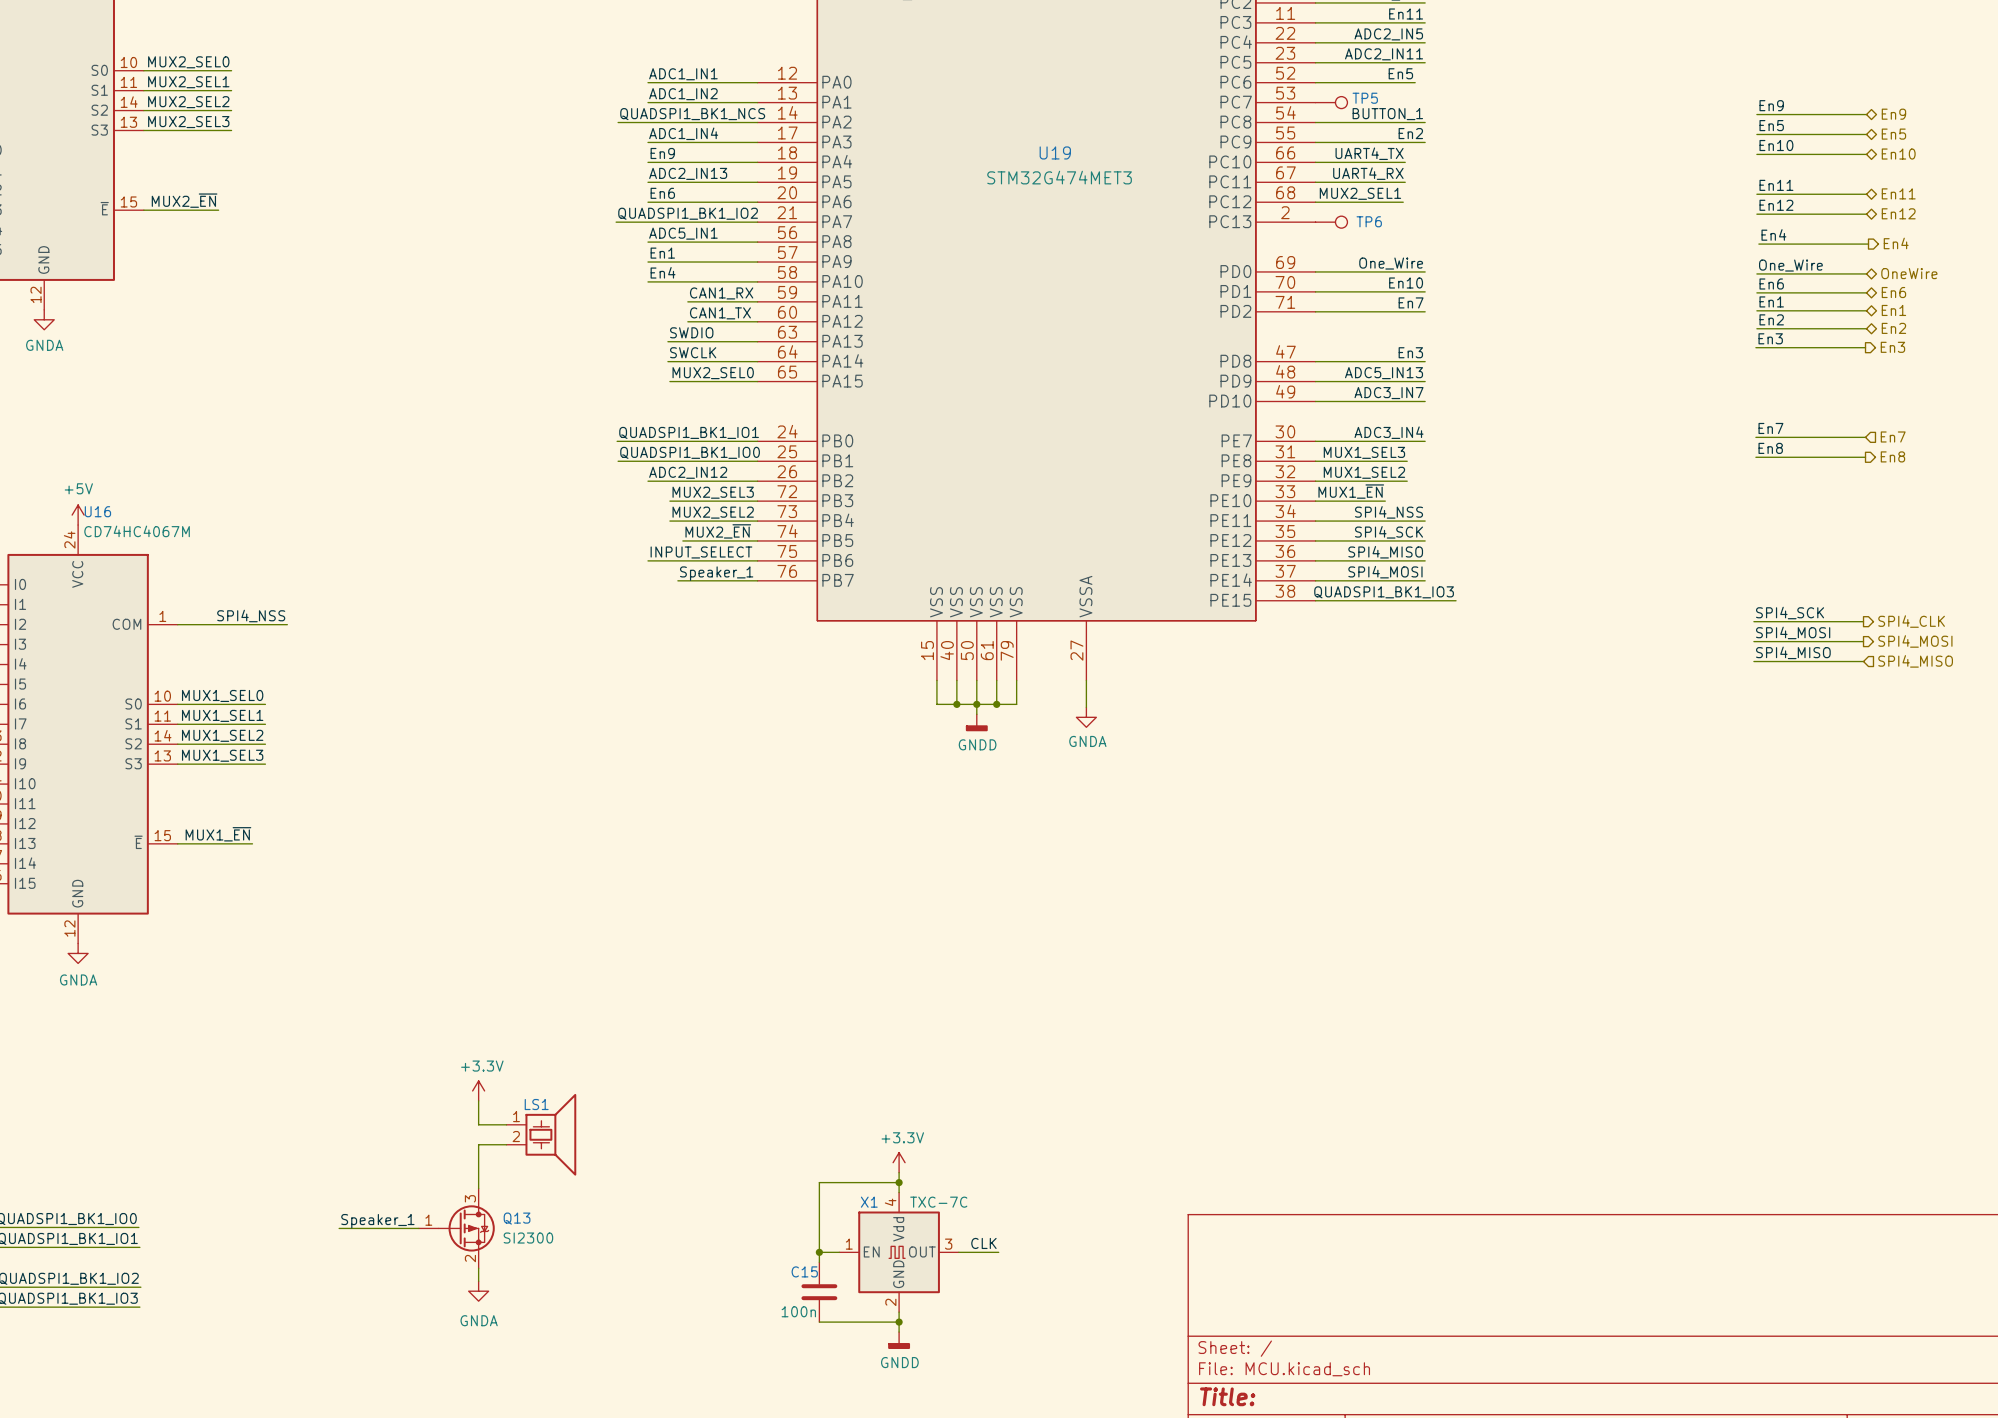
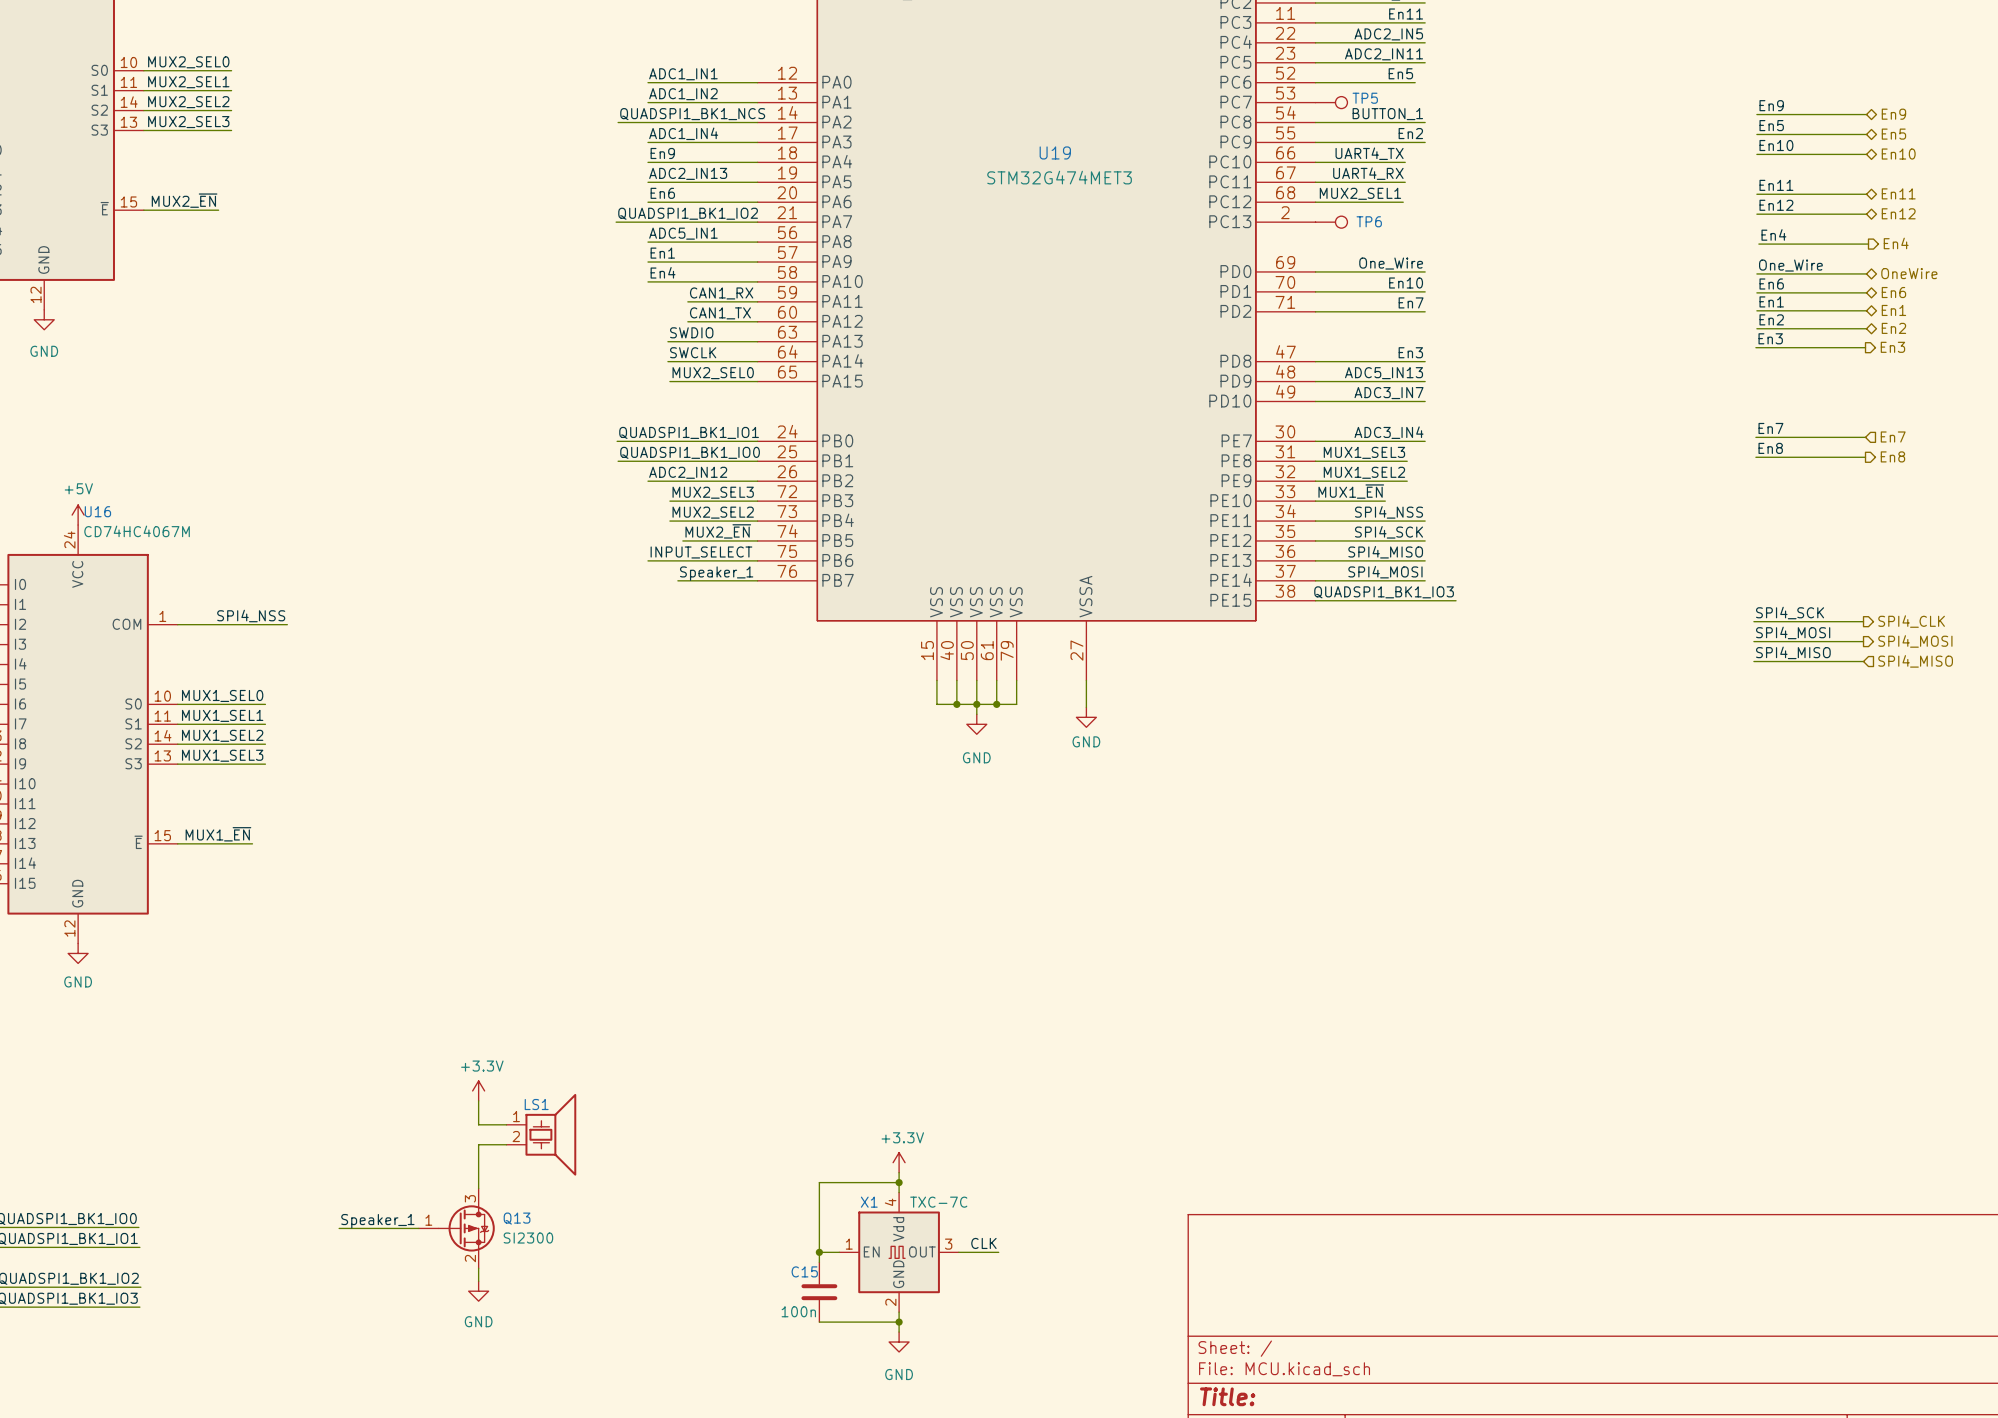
power symbol: GNDA (44, 319) -> GND (44, 319)
power symbol: GNDA (1086, 717) -> GND (1086, 717)
power symbol: GNDD (976, 722) -> GND (976, 724)
power symbol: GNDA (78, 953) -> GND (78, 953)
power symbol: GNDA (478, 1291) -> GND (478, 1291)
power symbol: GNDD (899, 1340) -> GND (899, 1342)

